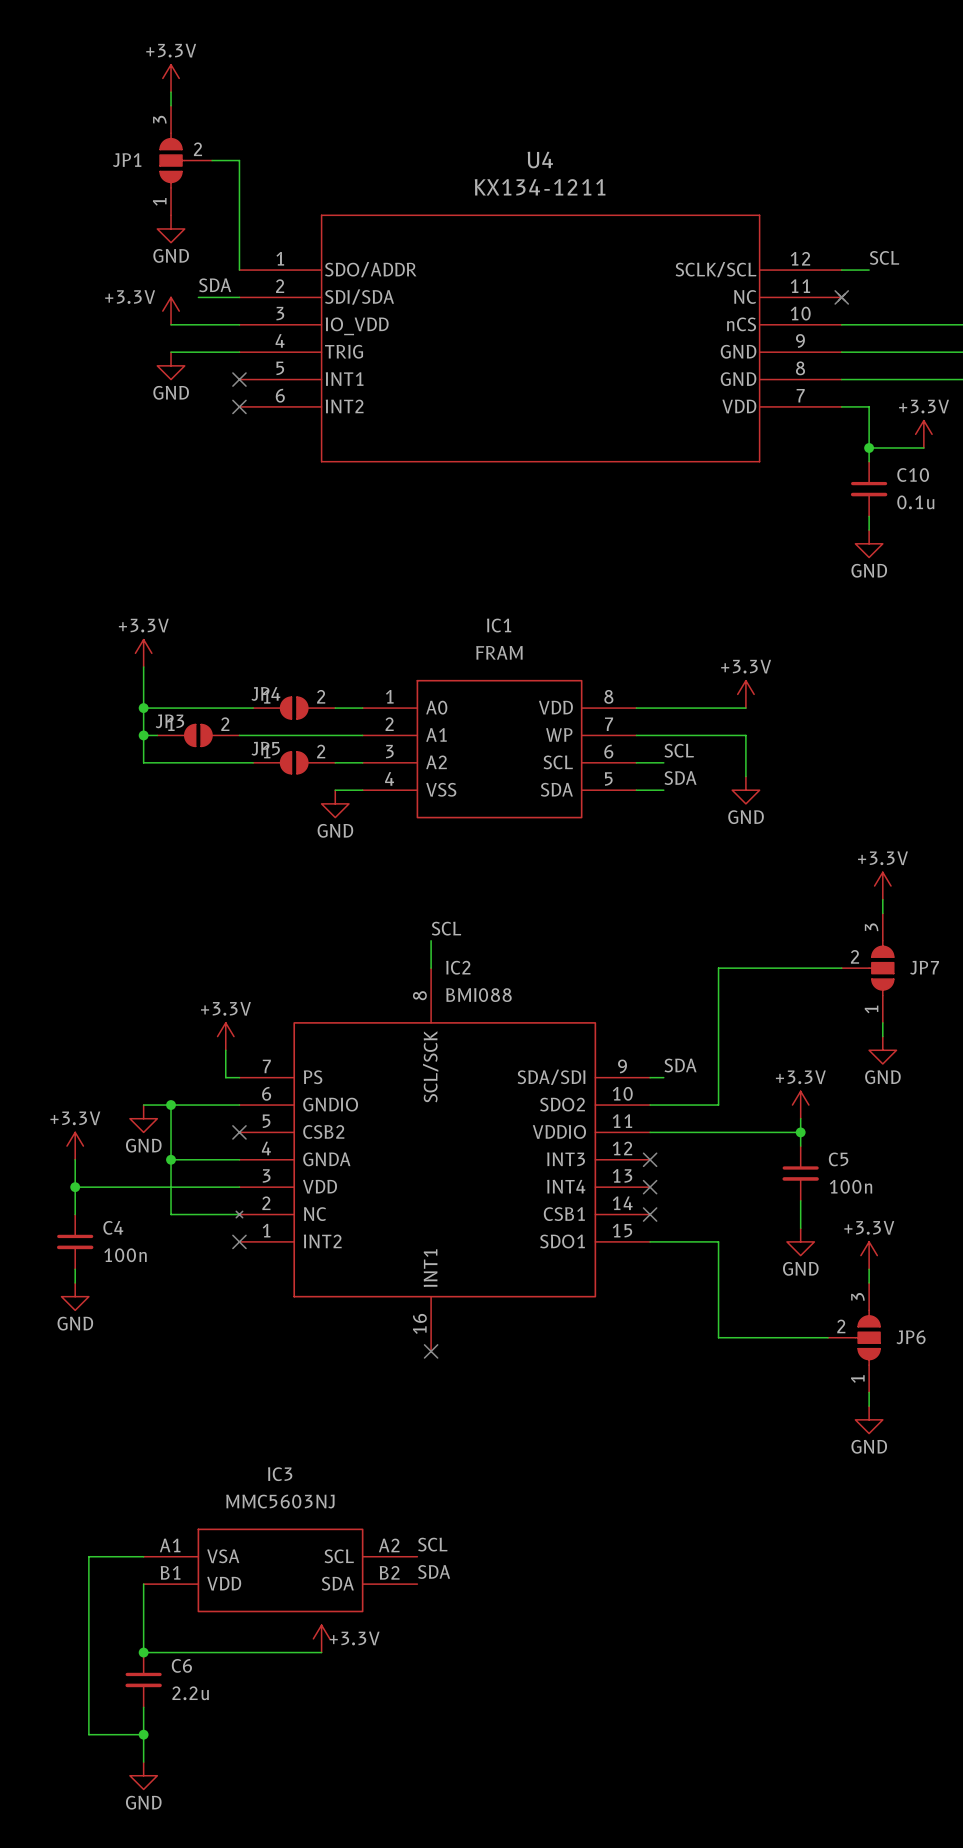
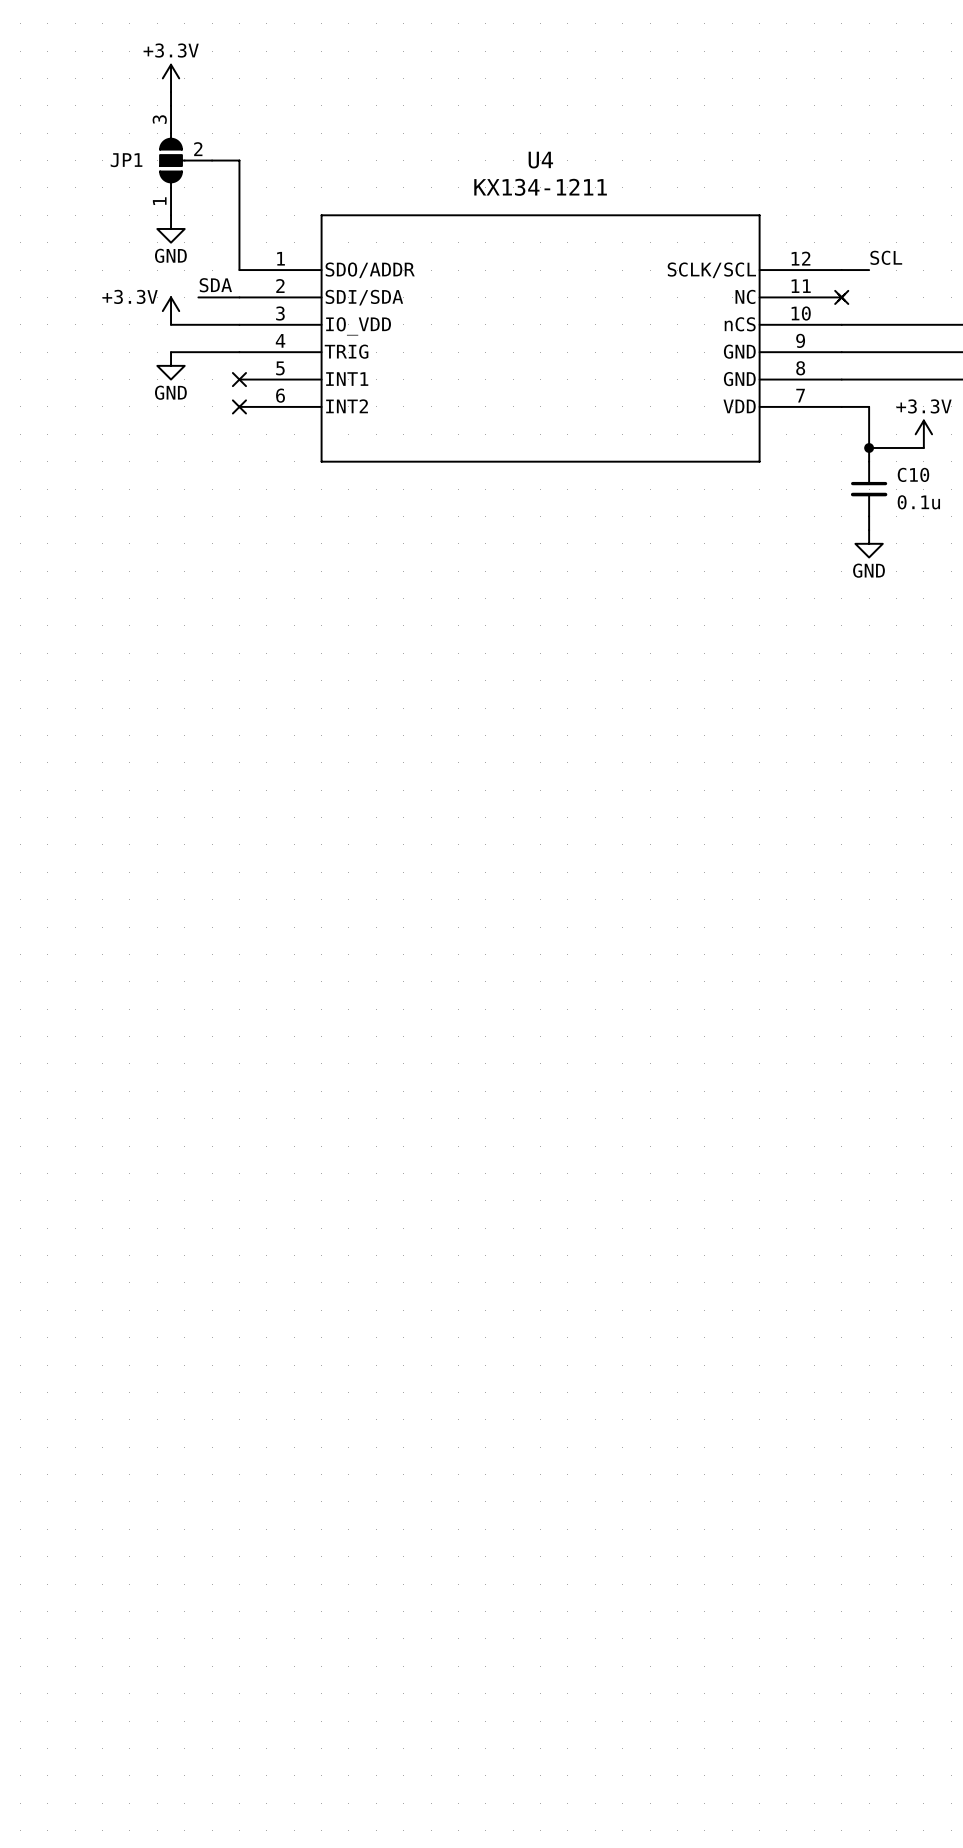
power symbol: +3.3V (143, 653) -> none
wire: (143, 667) (143, 762) (253, 762) -> none
power symbol: +3.3V (745, 694) -> none
wire: (143, 708) (253, 708) -> none
junction: (143, 708) -> none
JP4: (294, 708) -> none
wire: (335, 708) (362, 708) -> none
wire: (636, 708) (745, 708) -> none
wire: (143, 735) (157, 735) -> none
junction: (143, 735) -> none
JP3: (198, 735) -> none
wire: (239, 735) (362, 735) -> none
wire: (636, 735) (745, 735) (745, 776) -> none
IC1: FRAM (499, 749) -> none
label: SCL (679, 750) -> none
JP5: (294, 762) -> none
wire: (335, 762) (362, 762) -> none
wire: (636, 762) (663, 762) -> none
label: SDA (680, 778) -> none
wire: (335, 790) (362, 790) -> none
wire: (636, 790) (663, 790) -> none
power symbol: GND (745, 790) -> none
power symbol: GND (335, 803) -> none
power symbol: +3.3V (882, 886) -> none
wire: (882, 899) (882, 913) -> none
label: SCL (446, 928) -> none
wire: (431, 940) (431, 968) -> none
wire: (841, 968) (718, 968) (718, 1105) (650, 1105) -> none
JP7: (867, 968) -> none
wire: (882, 1022) (882, 1036) -> none
power symbol: +3.3V (225, 1036) -> none
wire: (225, 1050) (225, 1077) (239, 1077) -> none
power symbol: GND (882, 1050) -> none
label: SDA (680, 1065) -> none
wire: (650, 1077) (663, 1077) -> none
wire: (143, 1105) (239, 1105) -> none
wire: (171, 1105) (171, 1214) (239, 1214) -> none
junction: (171, 1105) -> none
power symbol: +3.3V (800, 1105) -> none
power symbol: GND (143, 1118) -> none
wire: (800, 1118) (800, 1146) -> none
no-connect mark: (239, 1132) -> none
wire: (650, 1132) (800, 1132) -> none
junction: (800, 1132) -> none
power symbol: +3.3V (75, 1146) -> none
wire: (75, 1159) (75, 1214) -> none
wire: (171, 1159) (239, 1159) -> none
junction: (171, 1159) -> none
IC2: BMI088 (443, 1159) -> none
no-connect mark: (650, 1159) -> none
C5: 100n (800, 1173) -> none
wire: (75, 1187) (239, 1187) -> none
junction: (75, 1187) -> none
no-connect mark: (650, 1187) -> none
wire: (800, 1200) (800, 1228) -> none
no-connect mark: (650, 1214) -> none
C4: 100n (75, 1241) -> none
no-connect mark: (239, 1241) -> none
wire: (650, 1241) (718, 1241) (718, 1337) (828, 1337) -> none
power symbol: GND (800, 1241) -> none
power symbol: +3.3V (869, 1255) -> none
wire: (75, 1269) (75, 1282) -> none
wire: (869, 1269) (869, 1282) -> none
power symbol: GND (75, 1296) -> none
JP6: (854, 1337) -> none
no-connect mark: (431, 1351) -> none
wire: (869, 1392) (869, 1406) -> none
power symbol: GND (869, 1419) -> none
label: SCL (432, 1544) -> none
wire: (143, 1556) (88, 1556) (88, 1734) (143, 1734) -> none
IC3: MMC5603NJ (280, 1570) -> none
label: SDA (434, 1571) -> none
wire: (143, 1584) (143, 1652) (321, 1652) -> none
power symbol: +3.3V (321, 1638) -> none
junction: (143, 1652) -> none
C6: 2.2u (143, 1679) -> none
wire: (143, 1707) (143, 1762) -> none
junction: (143, 1734) -> none
power symbol: GND (143, 1775) -> none

